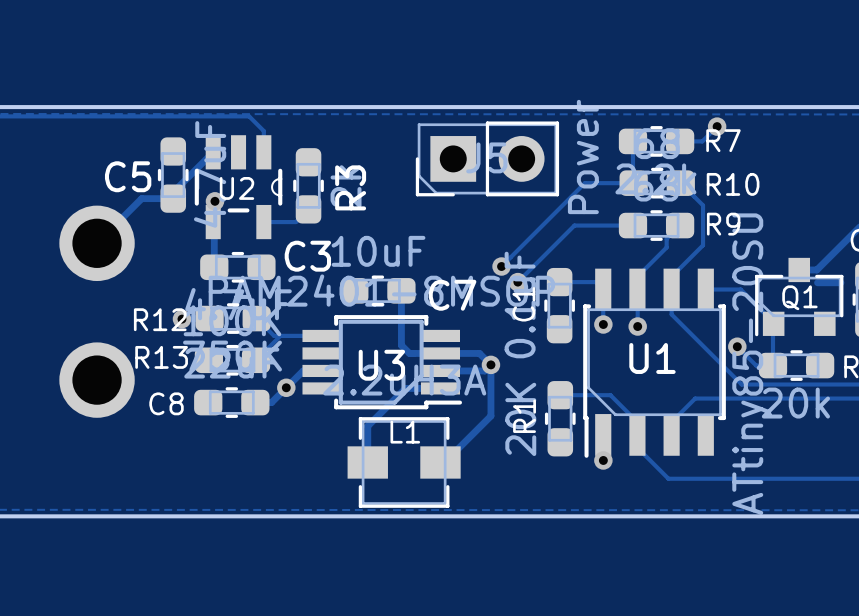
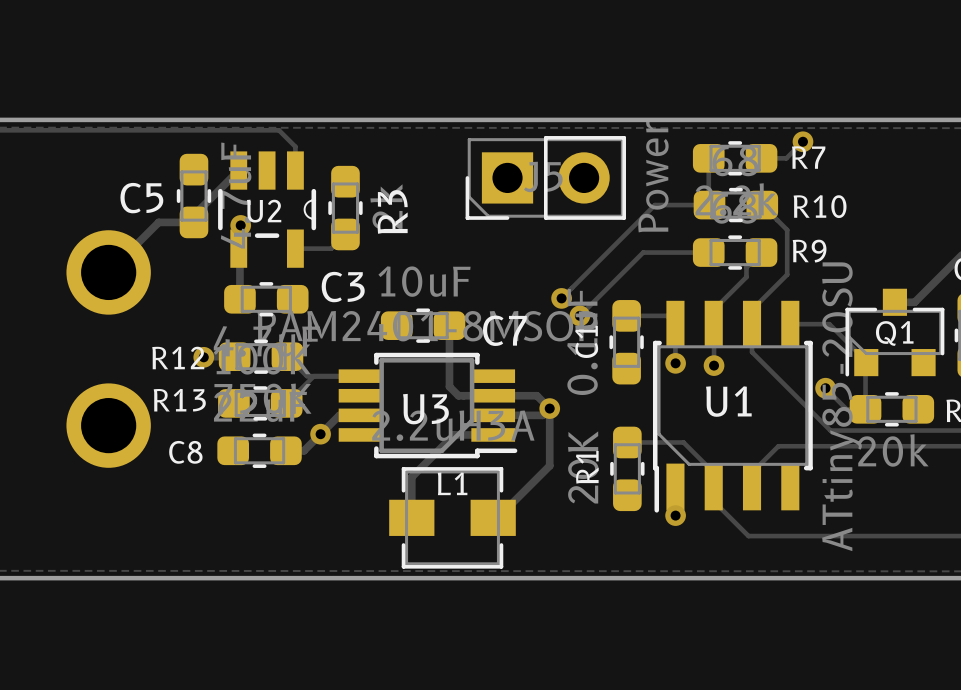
track: (817, 282) (840, 282) -> none

